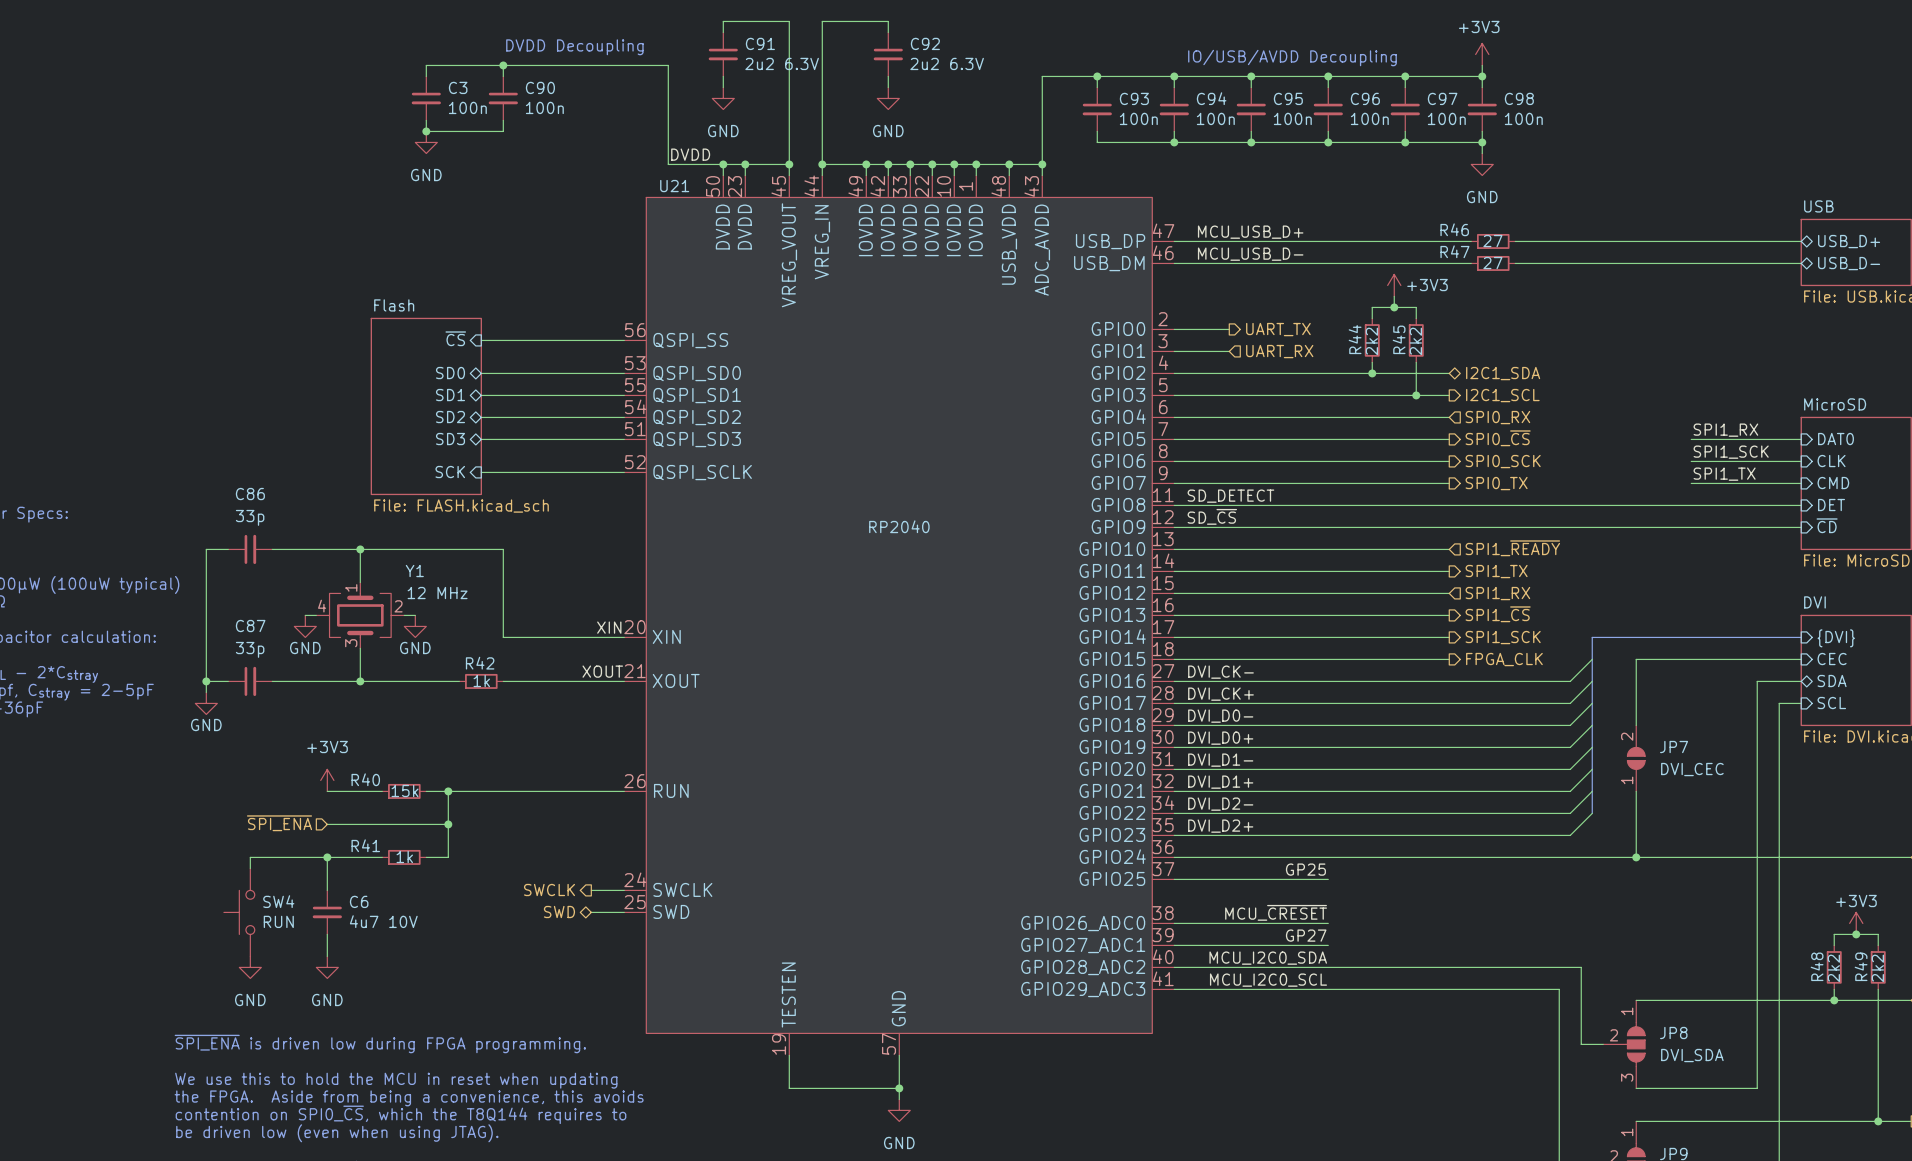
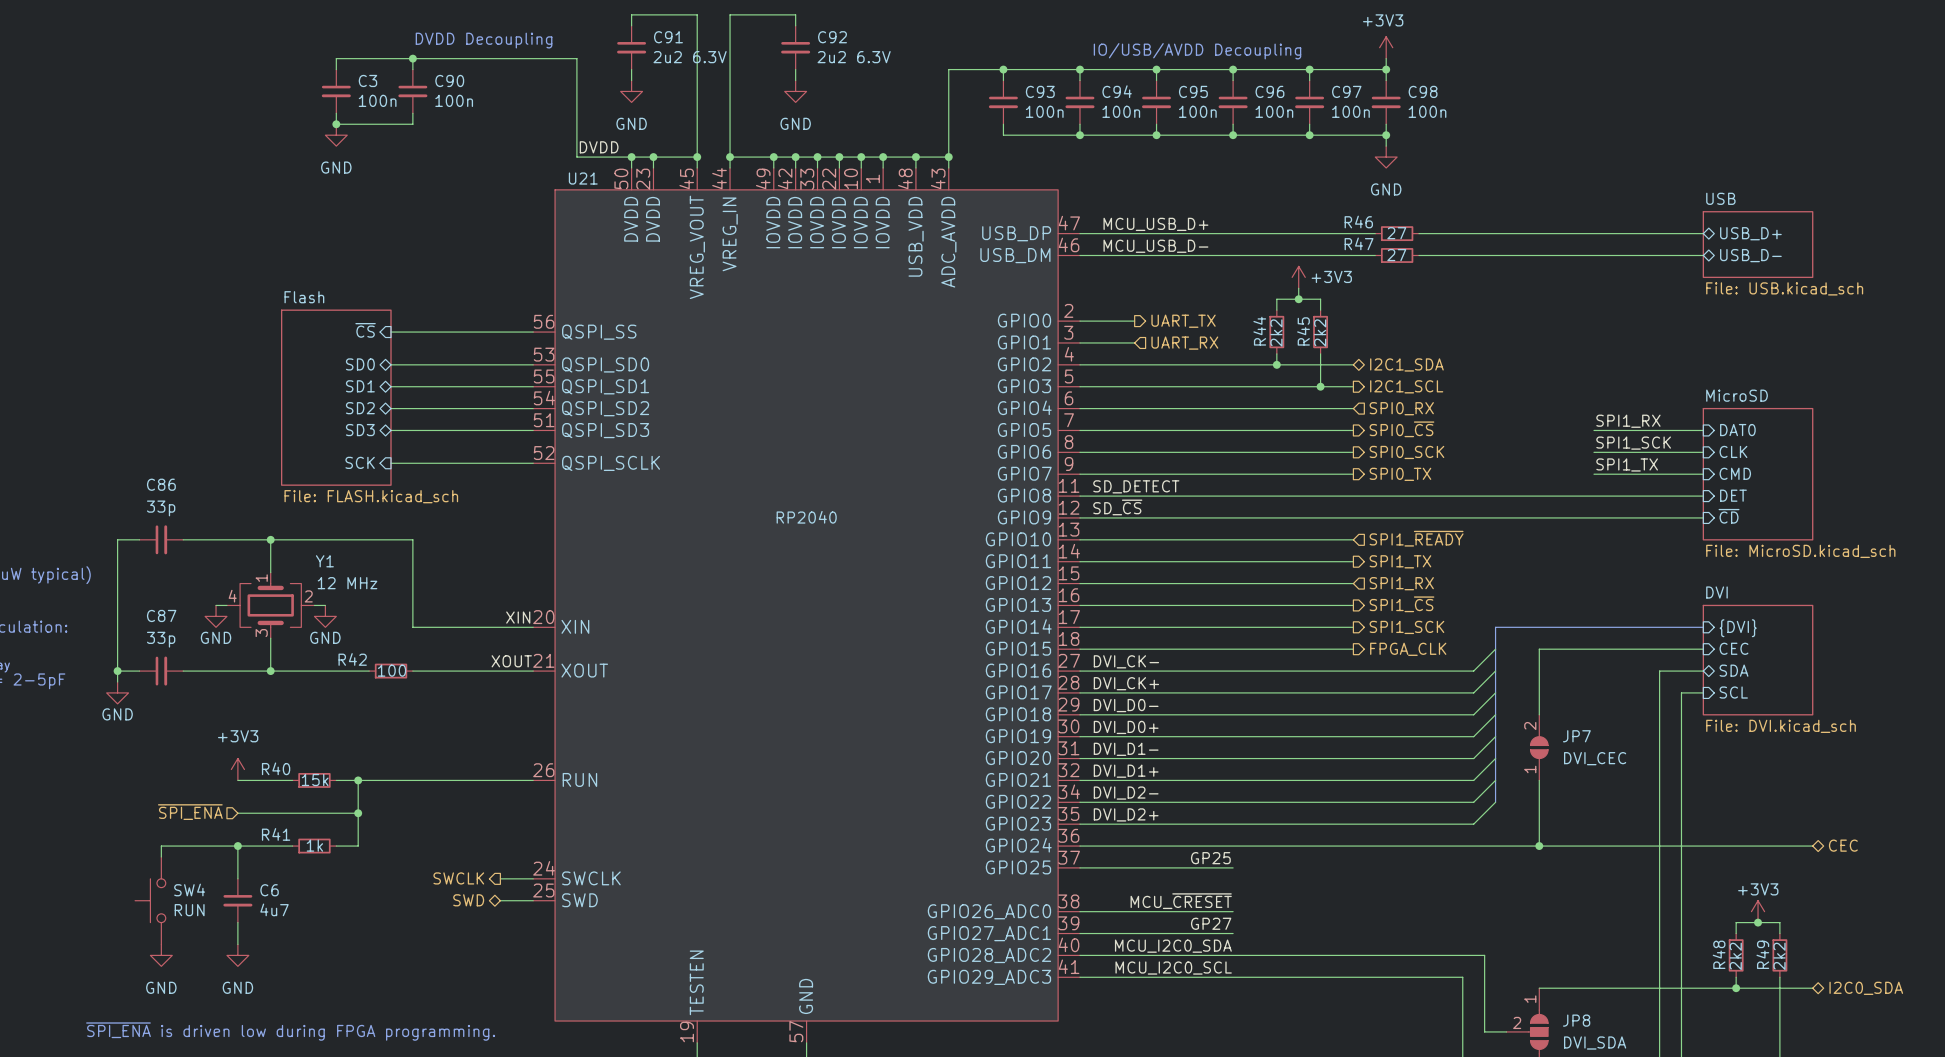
R42 name position: R42 (480, 663) -> R42 (352, 659)
R42 value: 1k (481, 681) -> 100 (392, 670)
C6 value: 4u7 10V (383, 921) -> 4u7 (274, 909)

